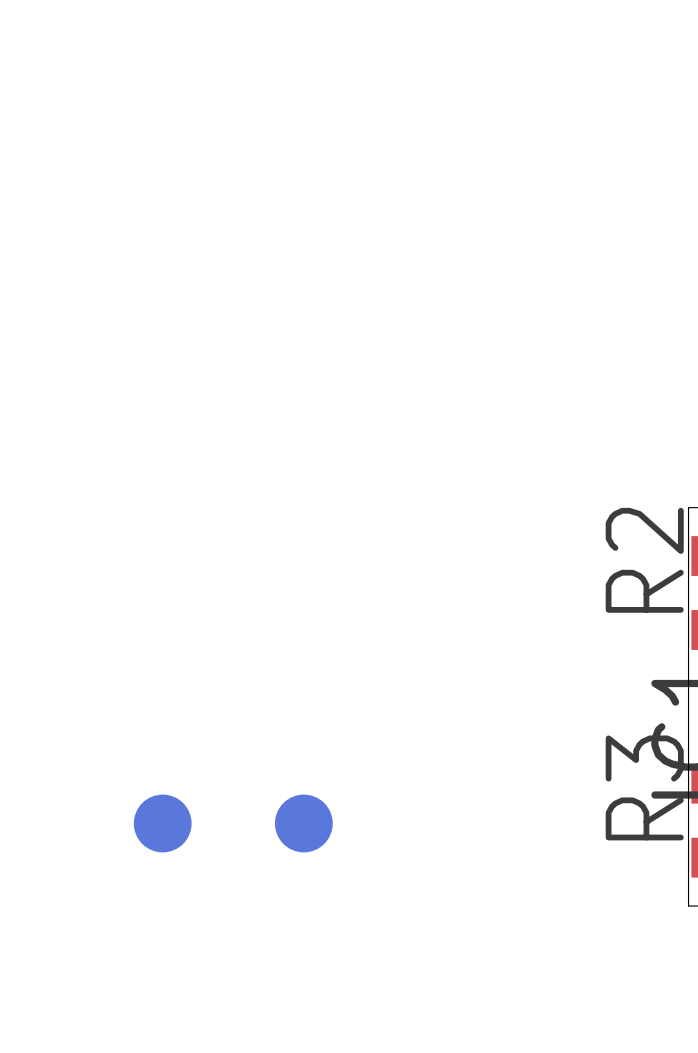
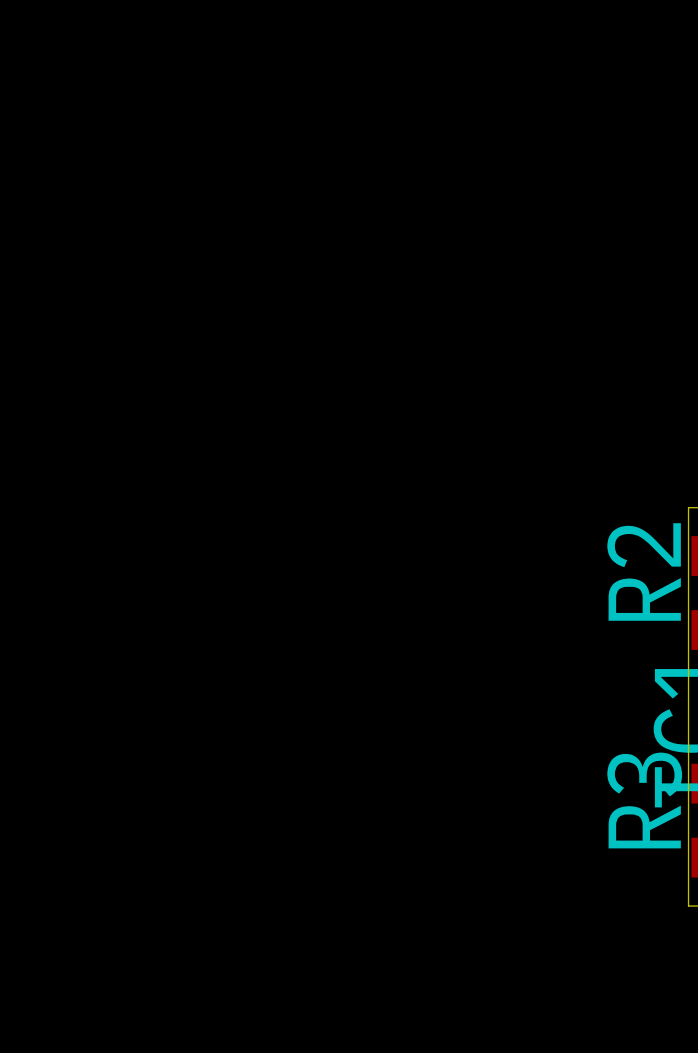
part: (233, 823) -> none

